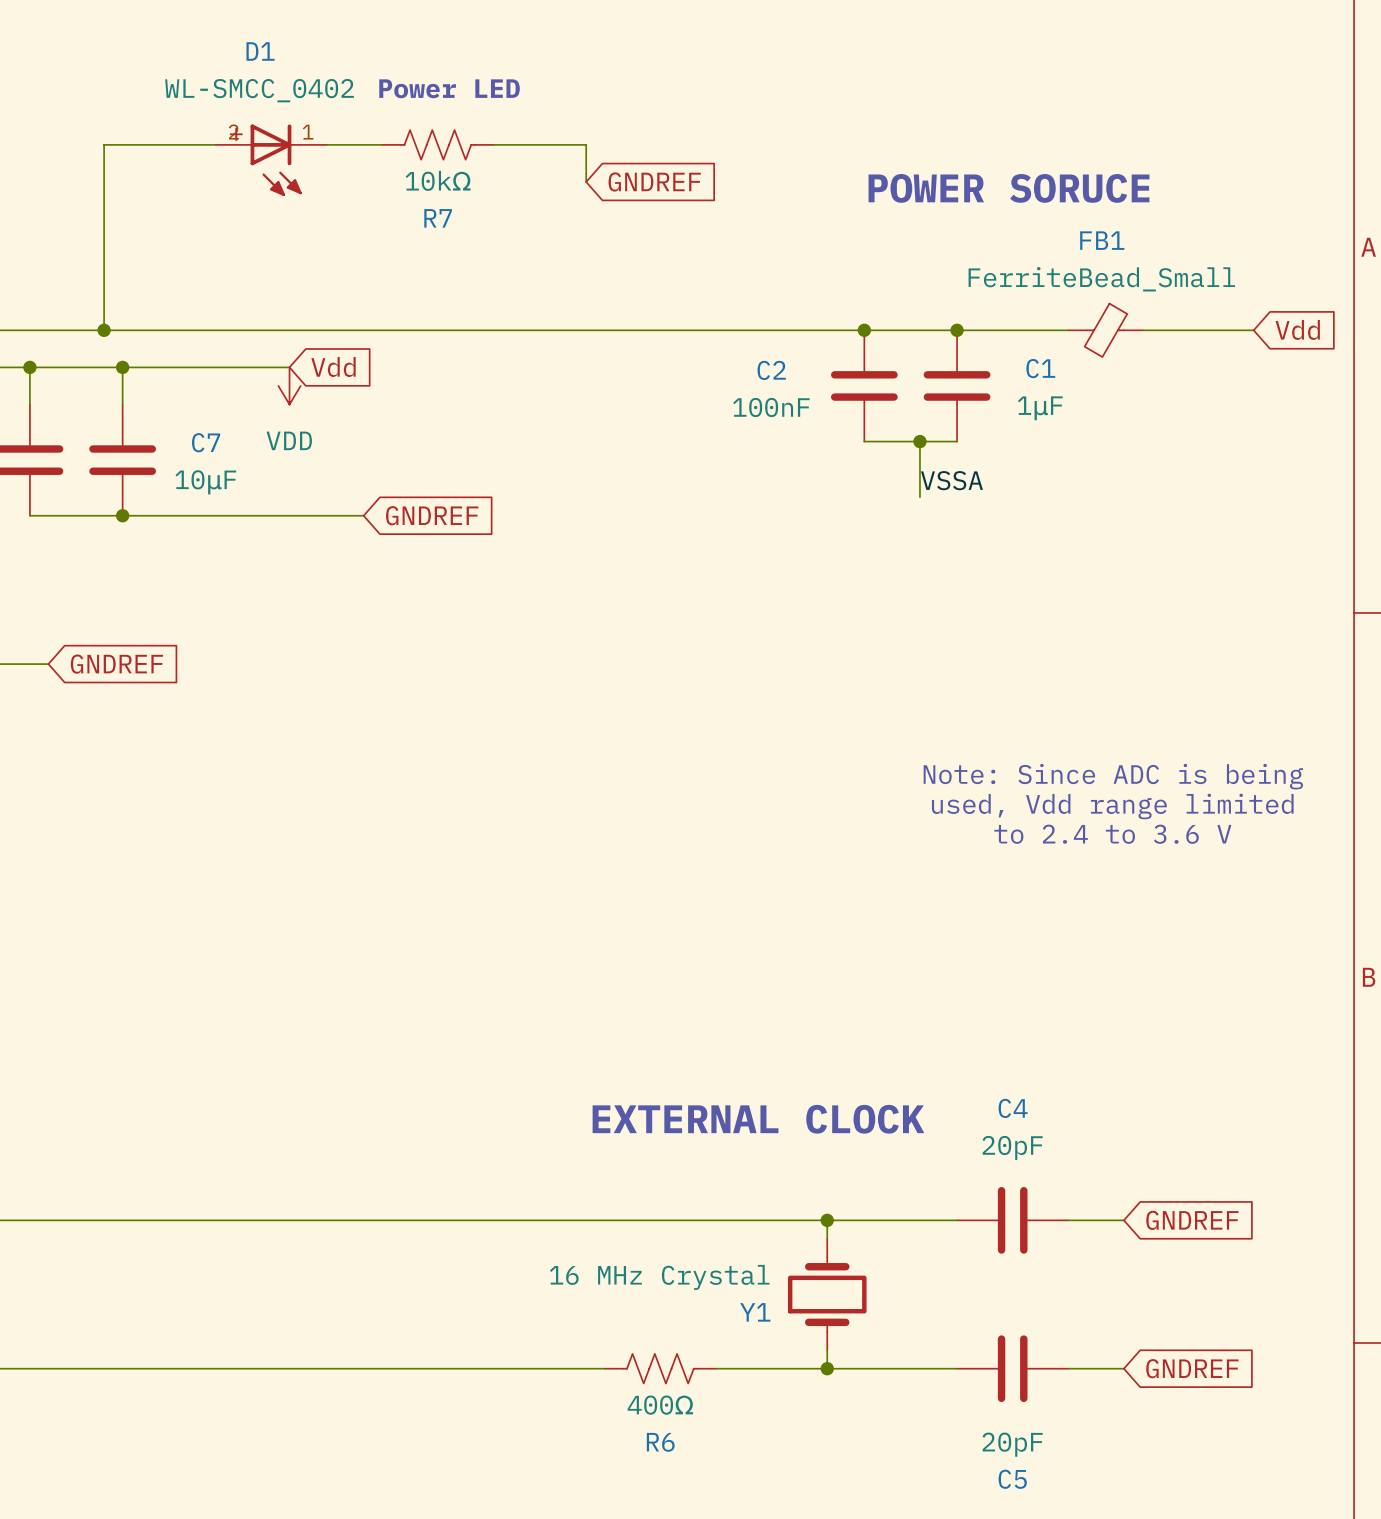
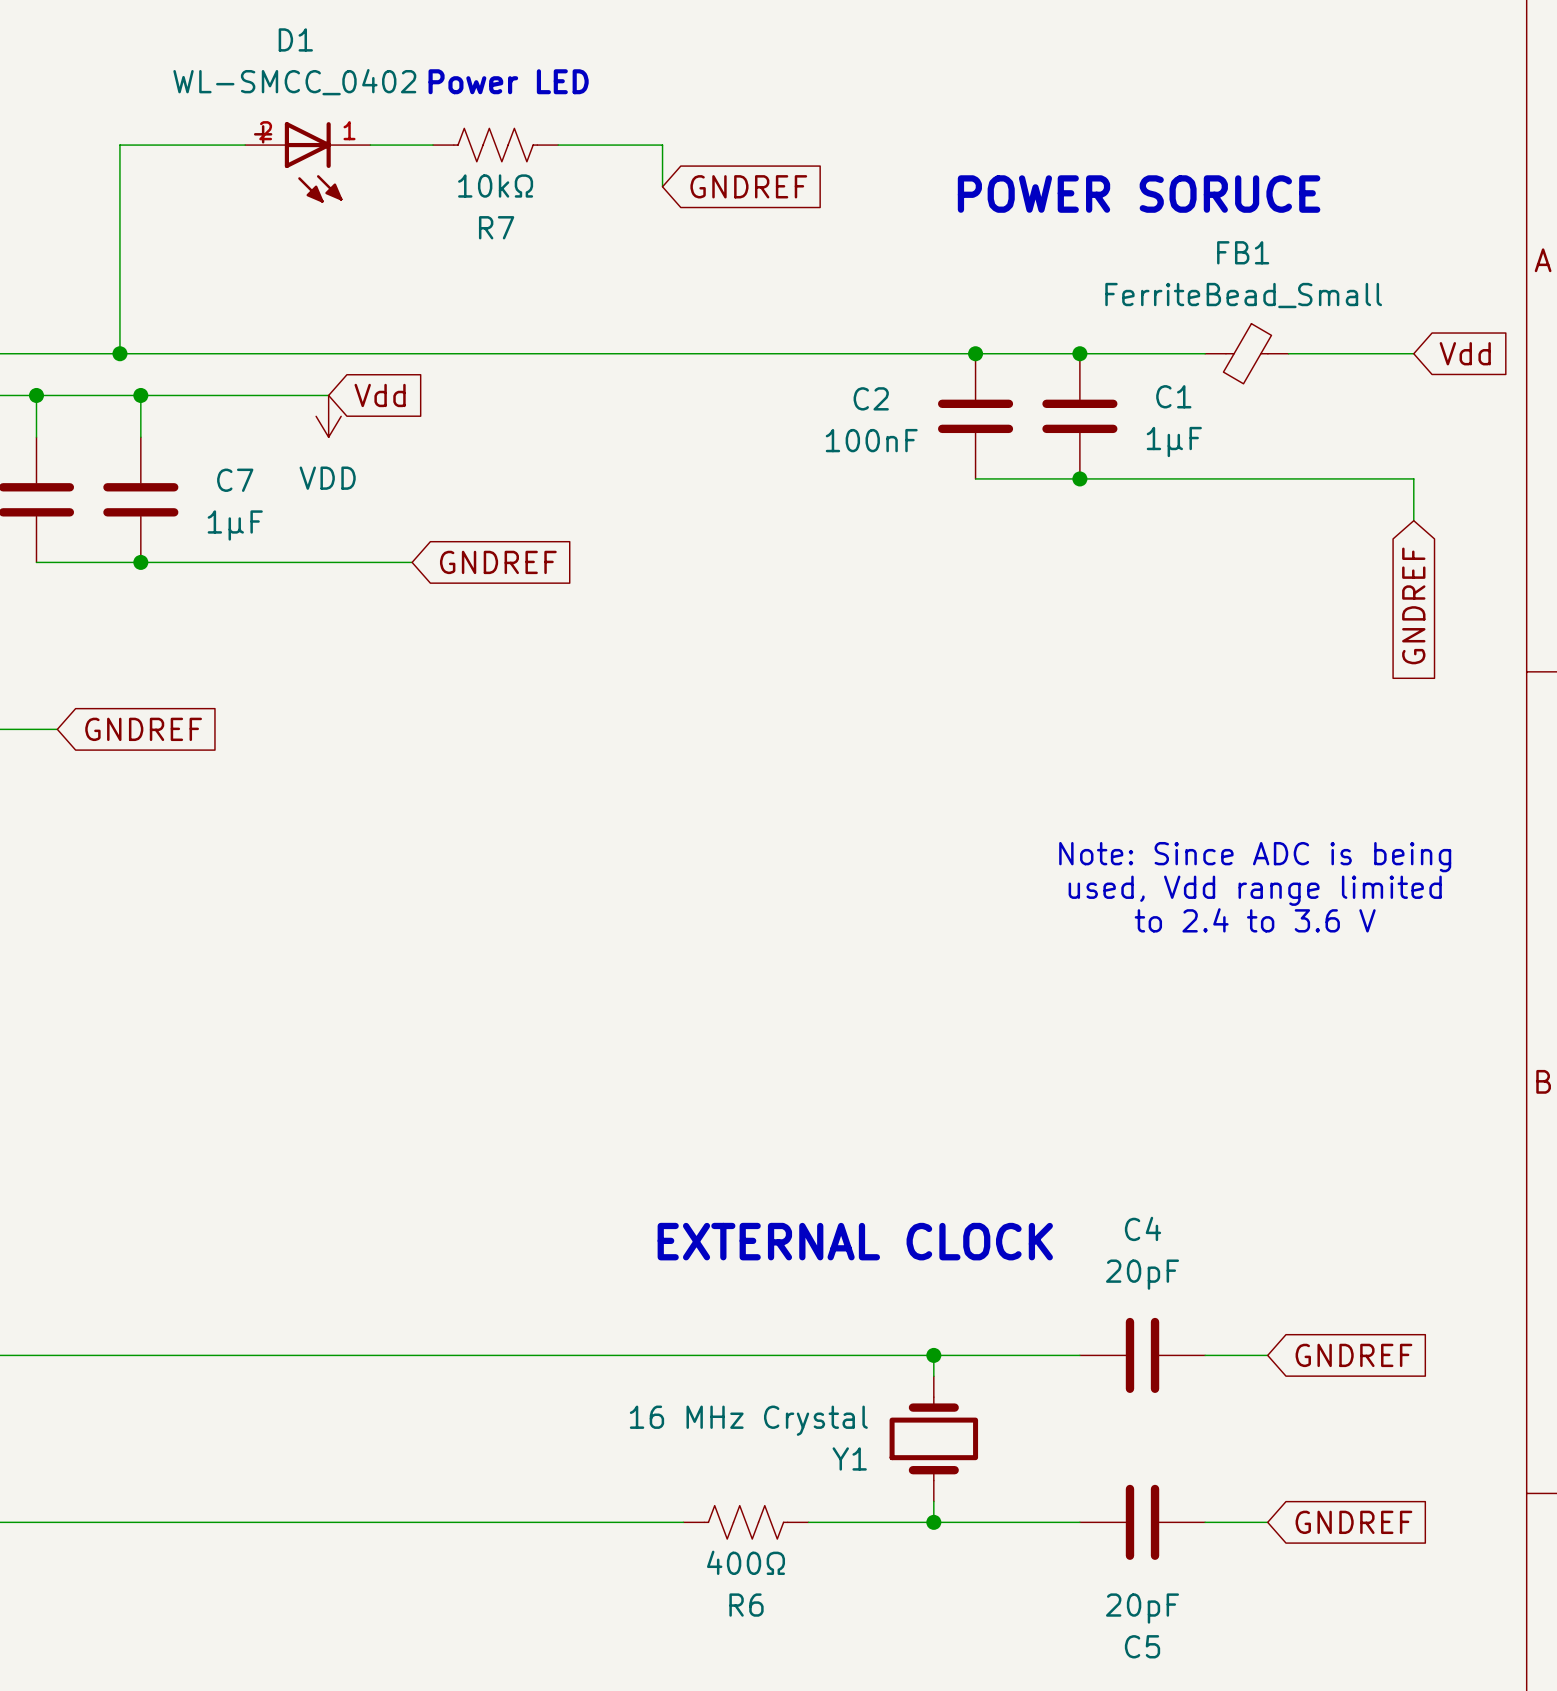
wire: (919, 441) (919, 497) -> none
junction position: (919, 441) -> (1079, 478)
wire: none -> (1079, 478) (1413, 478) (1413, 520)
label: VSSA (951, 480) -> none
C7 value: 10μF (205, 482) -> 1μF (235, 525)
global label: none -> GNDREF (1413, 605)

